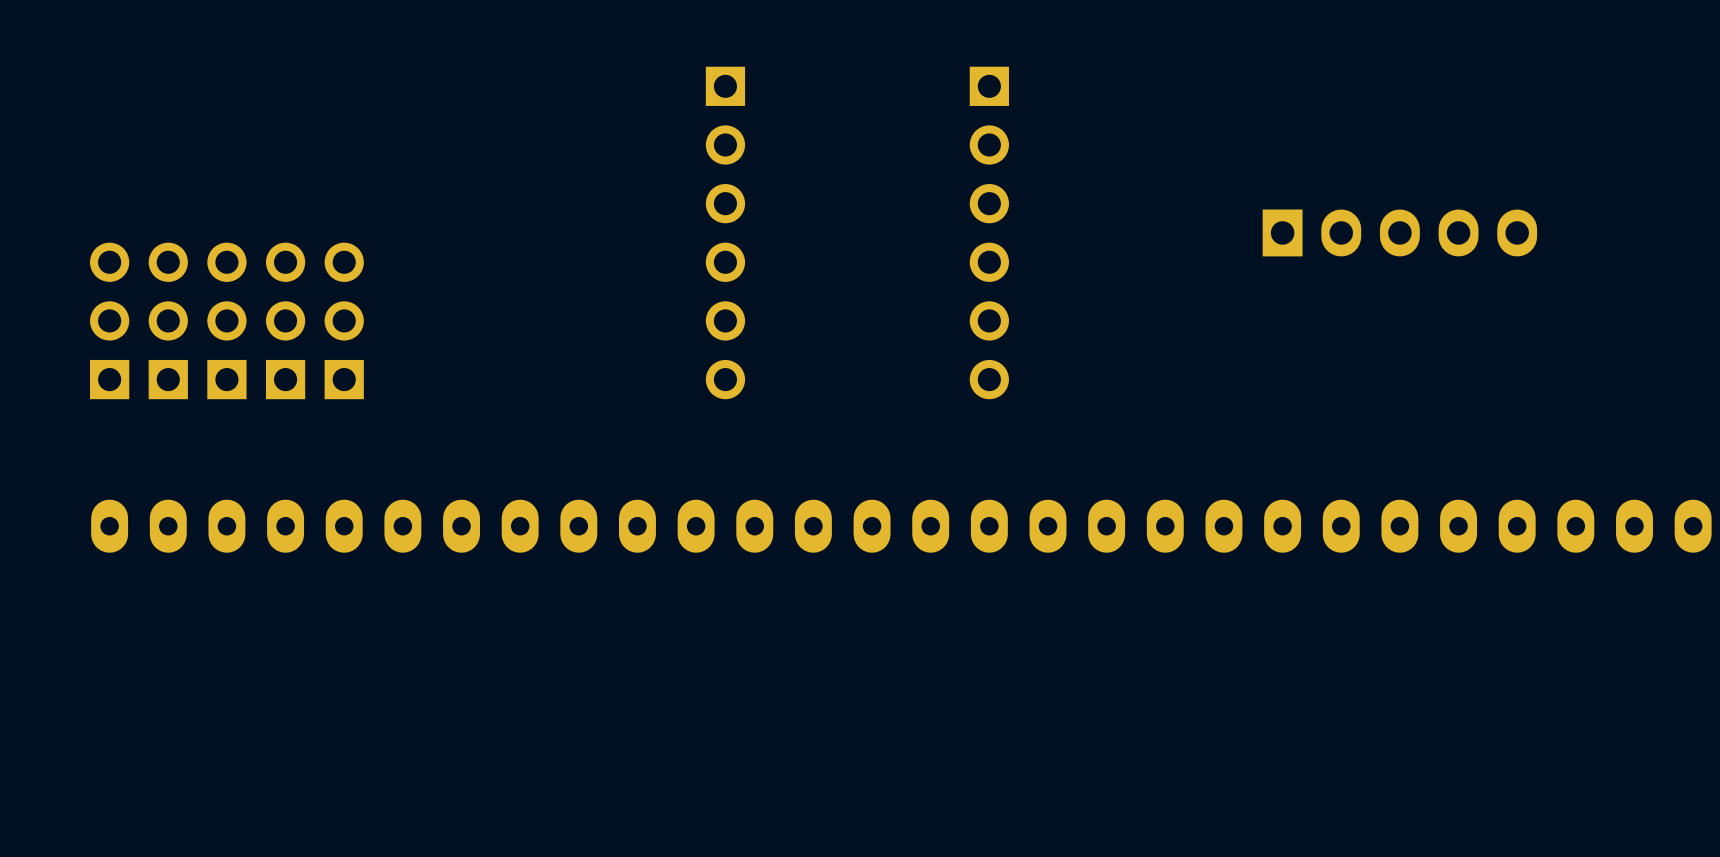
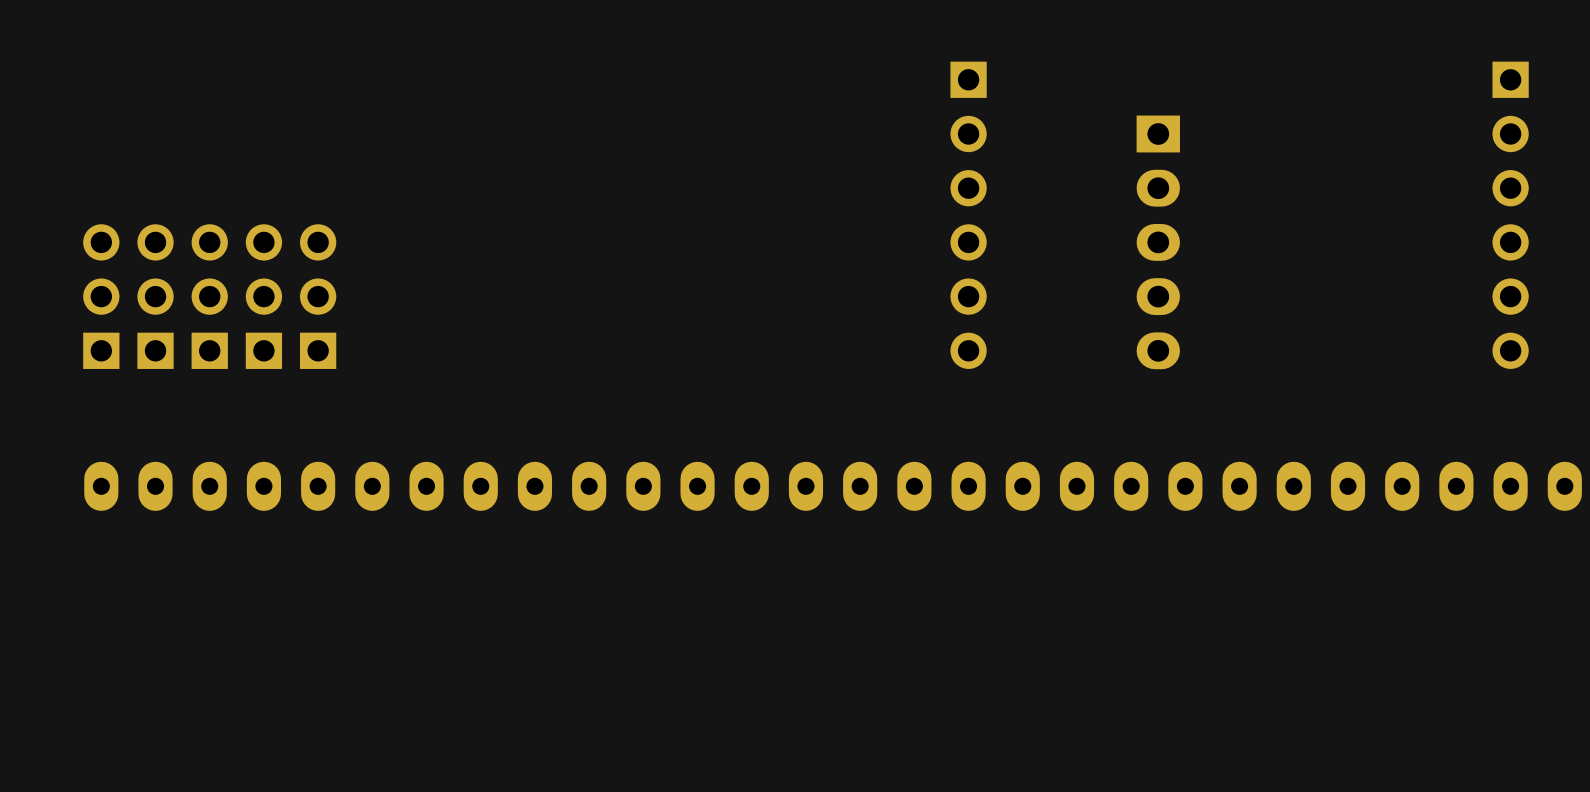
part: (725, 232) -> none
part position: (989, 232) -> (968, 215)
part rotation: 0° (1399, 232) -> 90° clockwise (1158, 242)
part: none -> (1510, 215)

